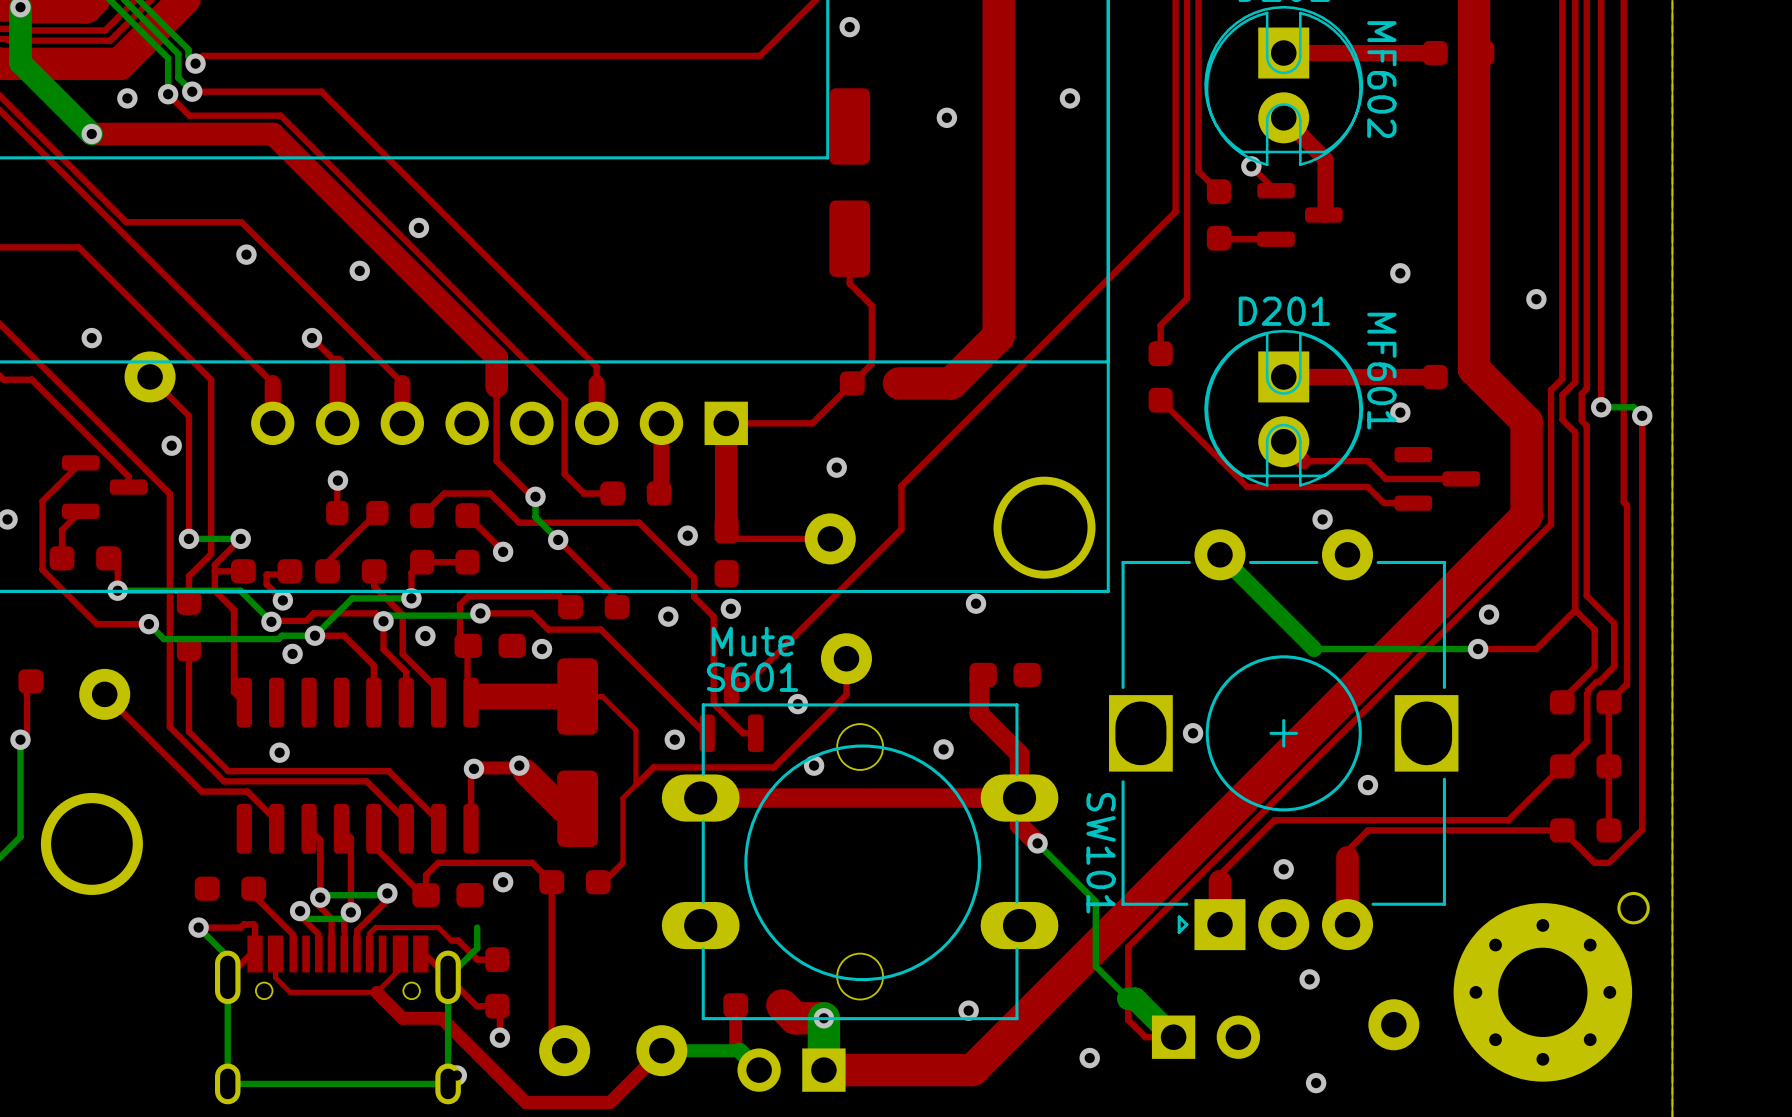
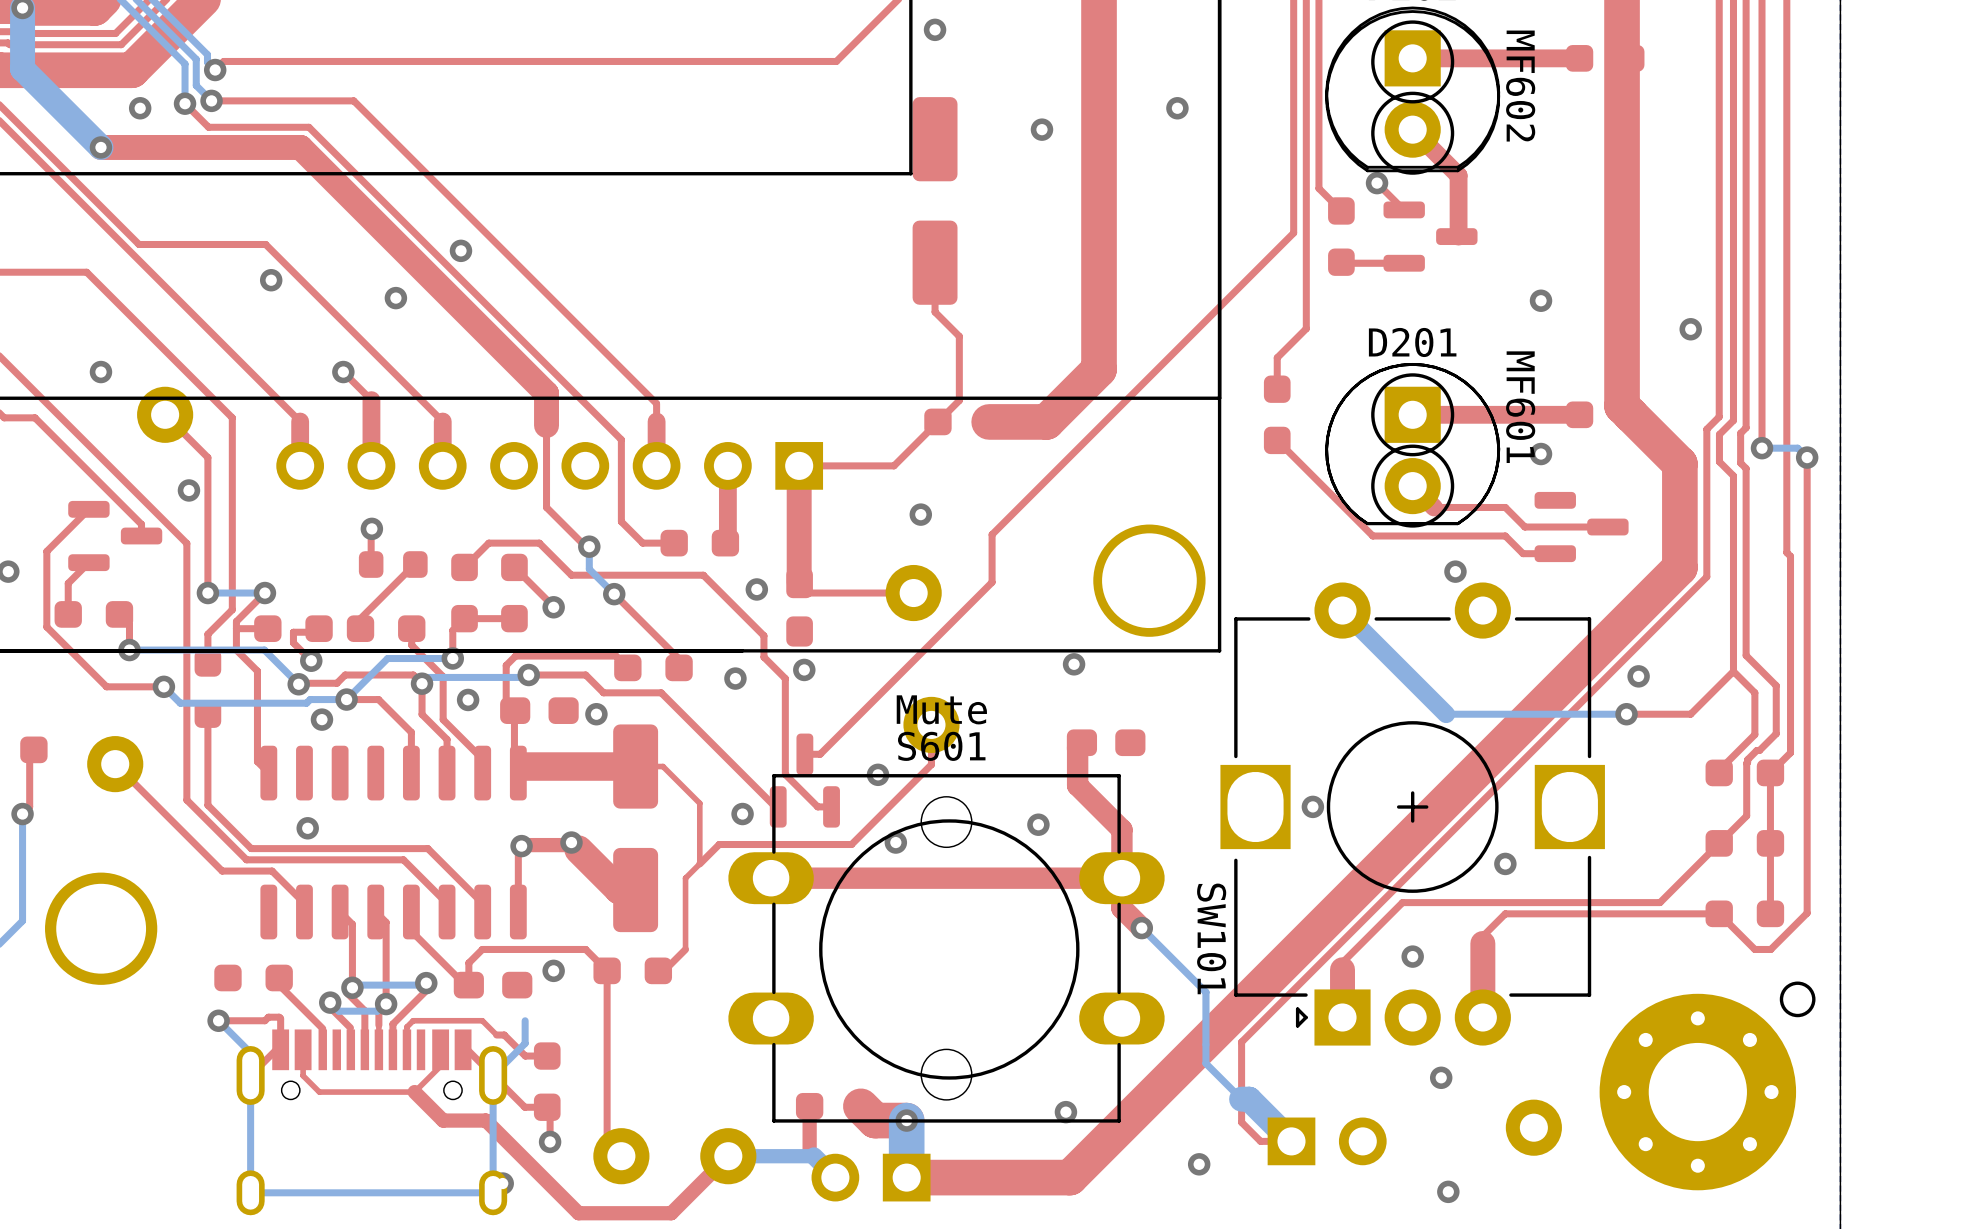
MF602 footprint: [1205, 11, 1362, 166] -> [1325, 10, 1501, 175]
MF601 footprint: [1205, 332, 1362, 487] -> [1325, 362, 1501, 528]
text position: Mute (753, 641) -> Mute (941, 709)
S601 name position: S601 (752, 677) -> S601 (941, 746)

